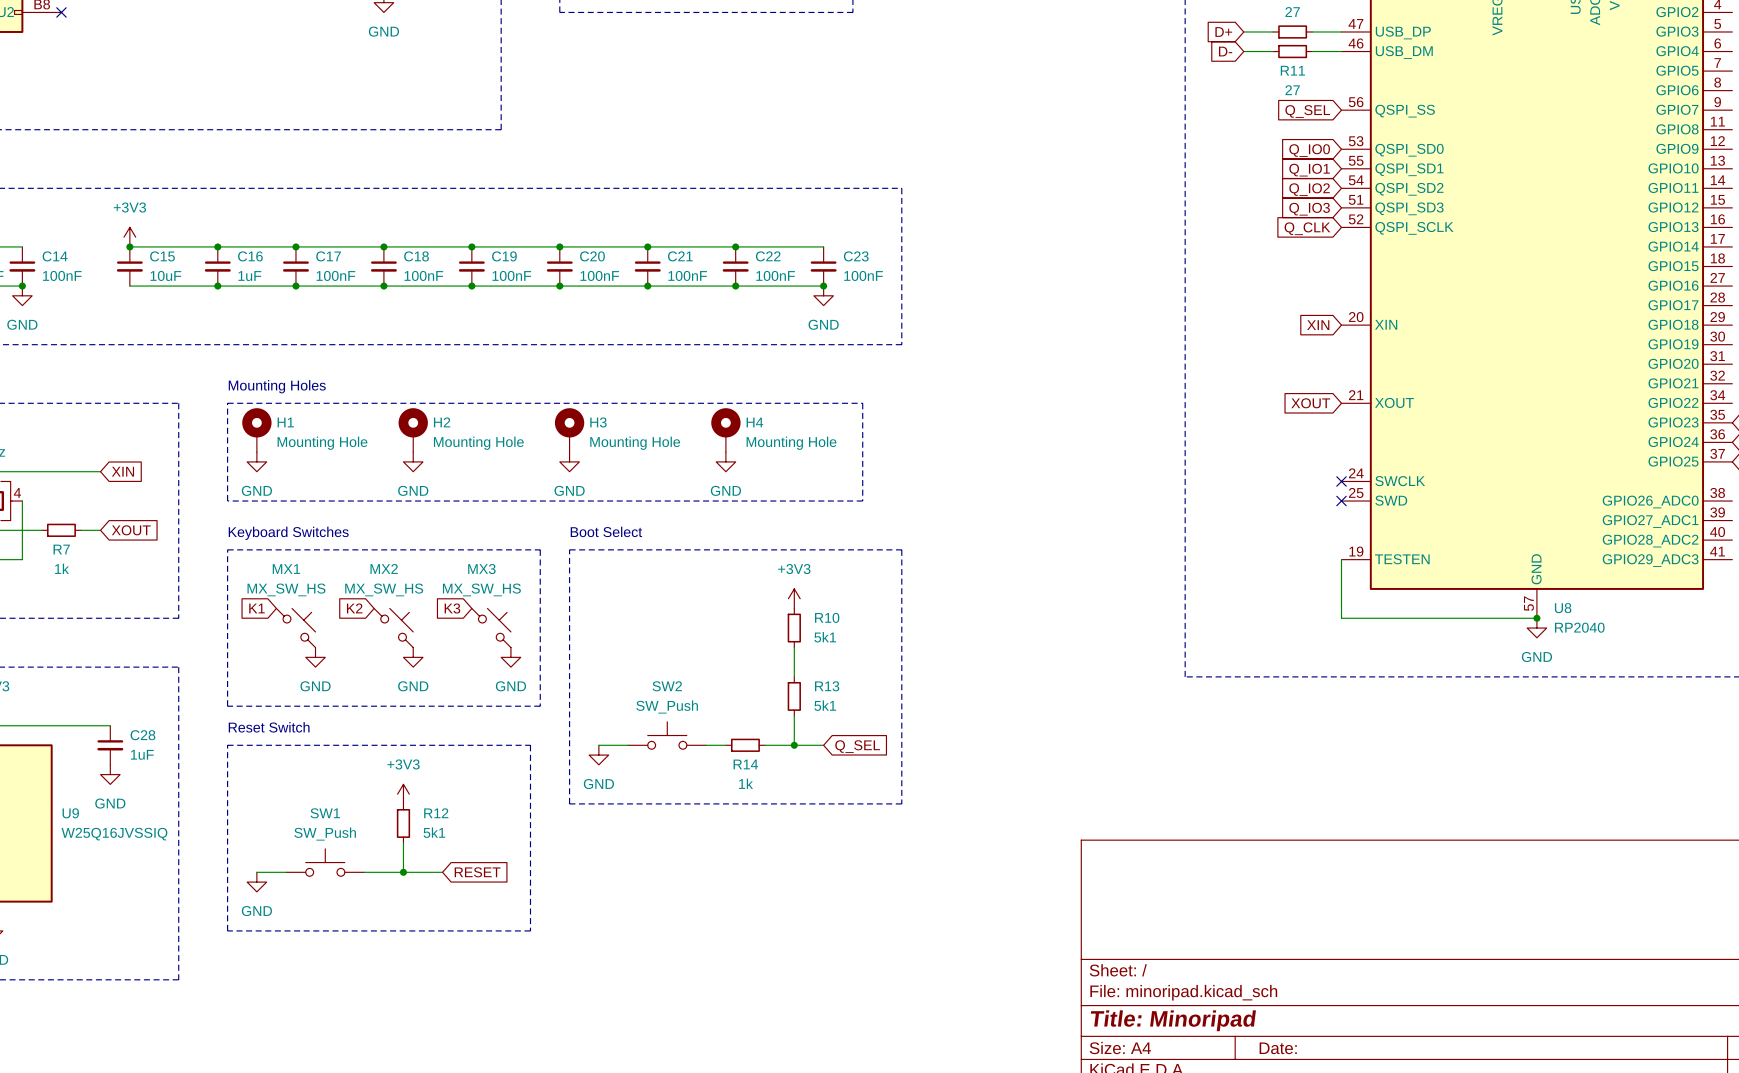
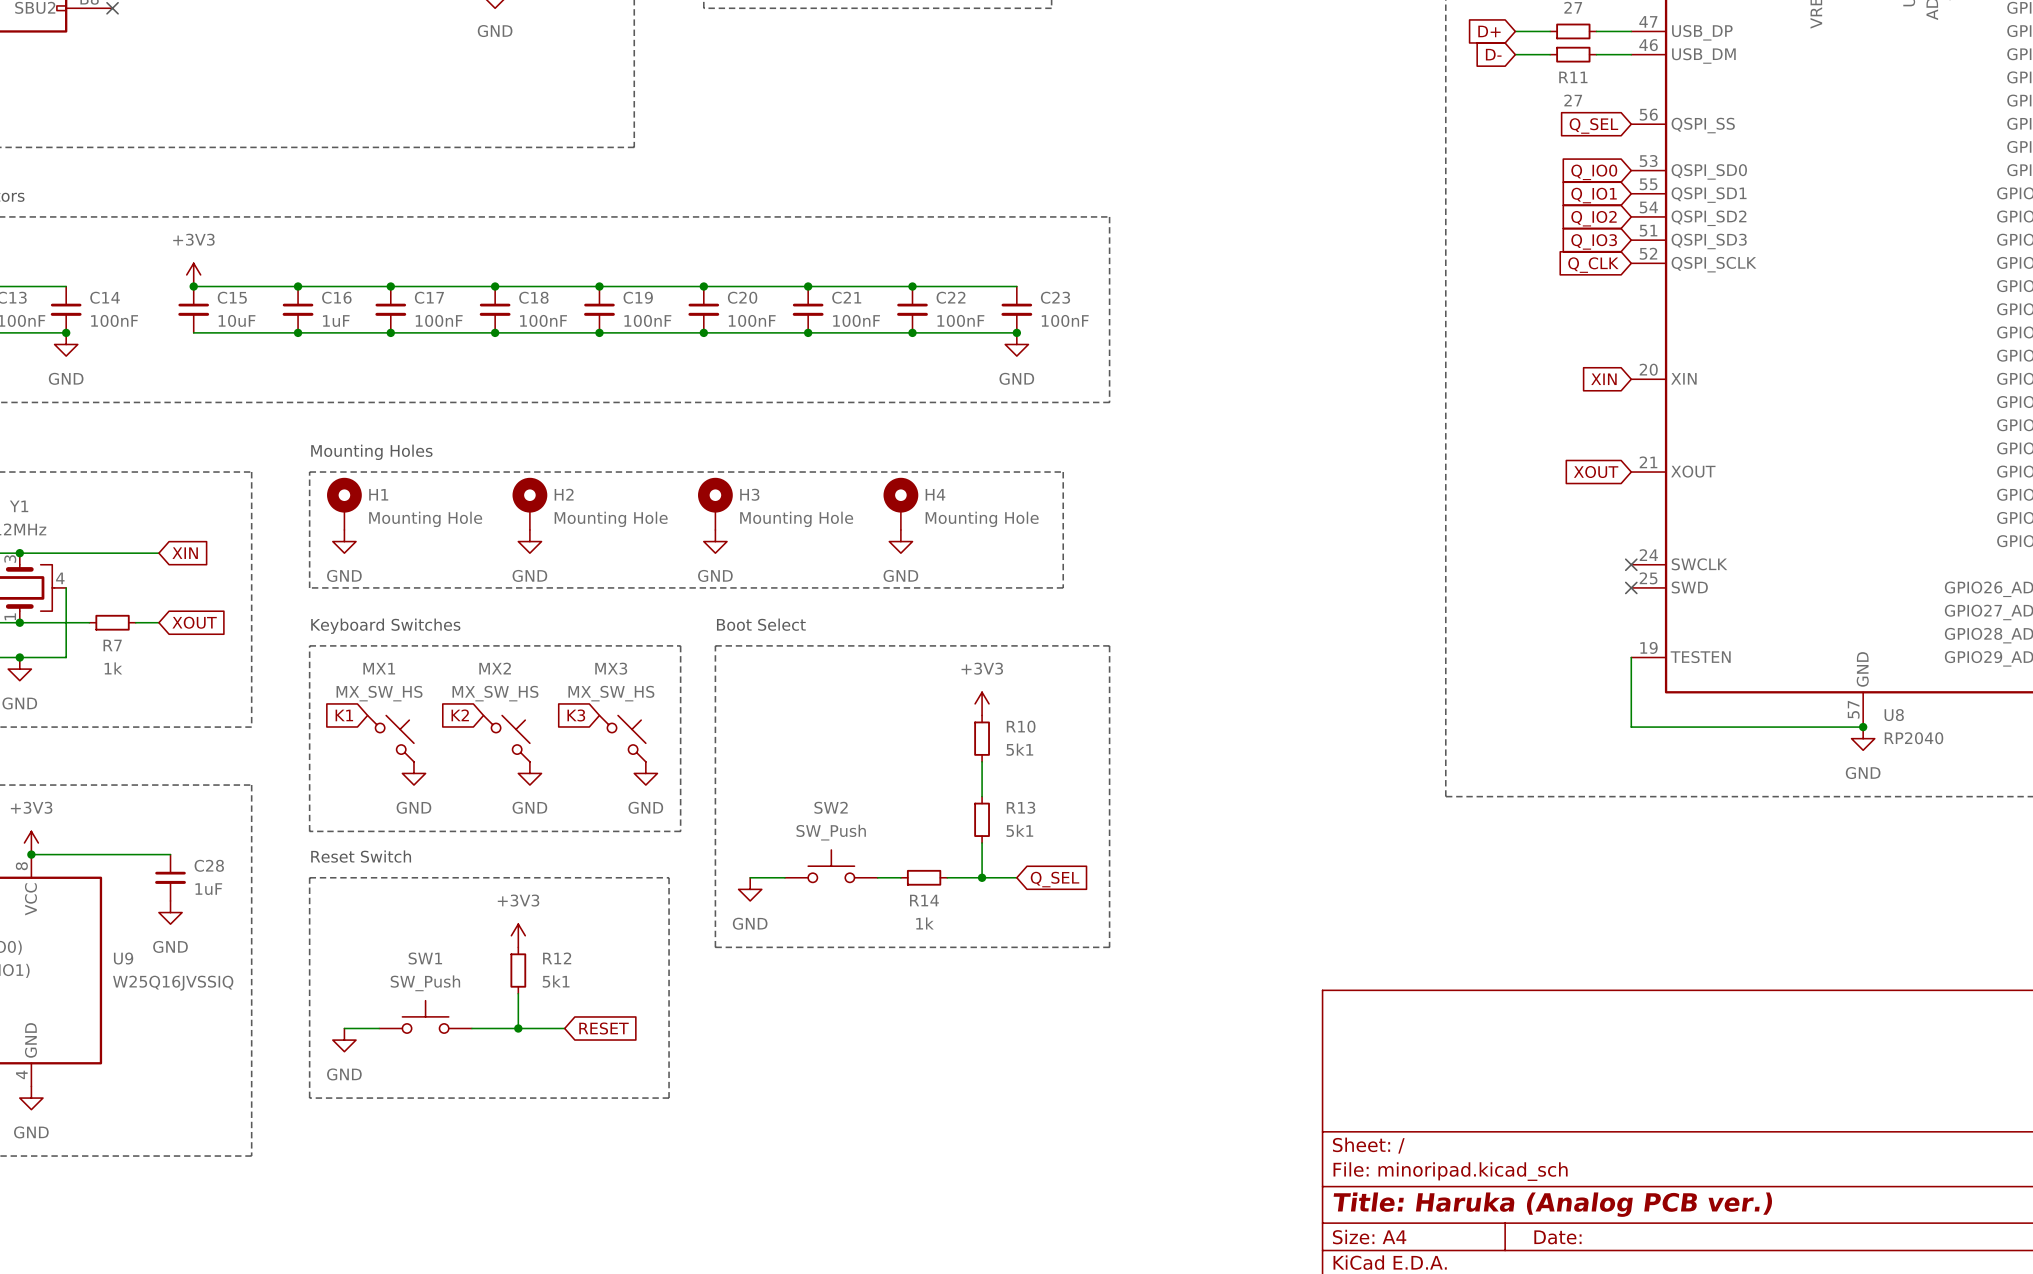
title block: Title: Minoripad (1173, 1020) -> Title: Haruka (Analog PCB ver.) (1552, 1204)

